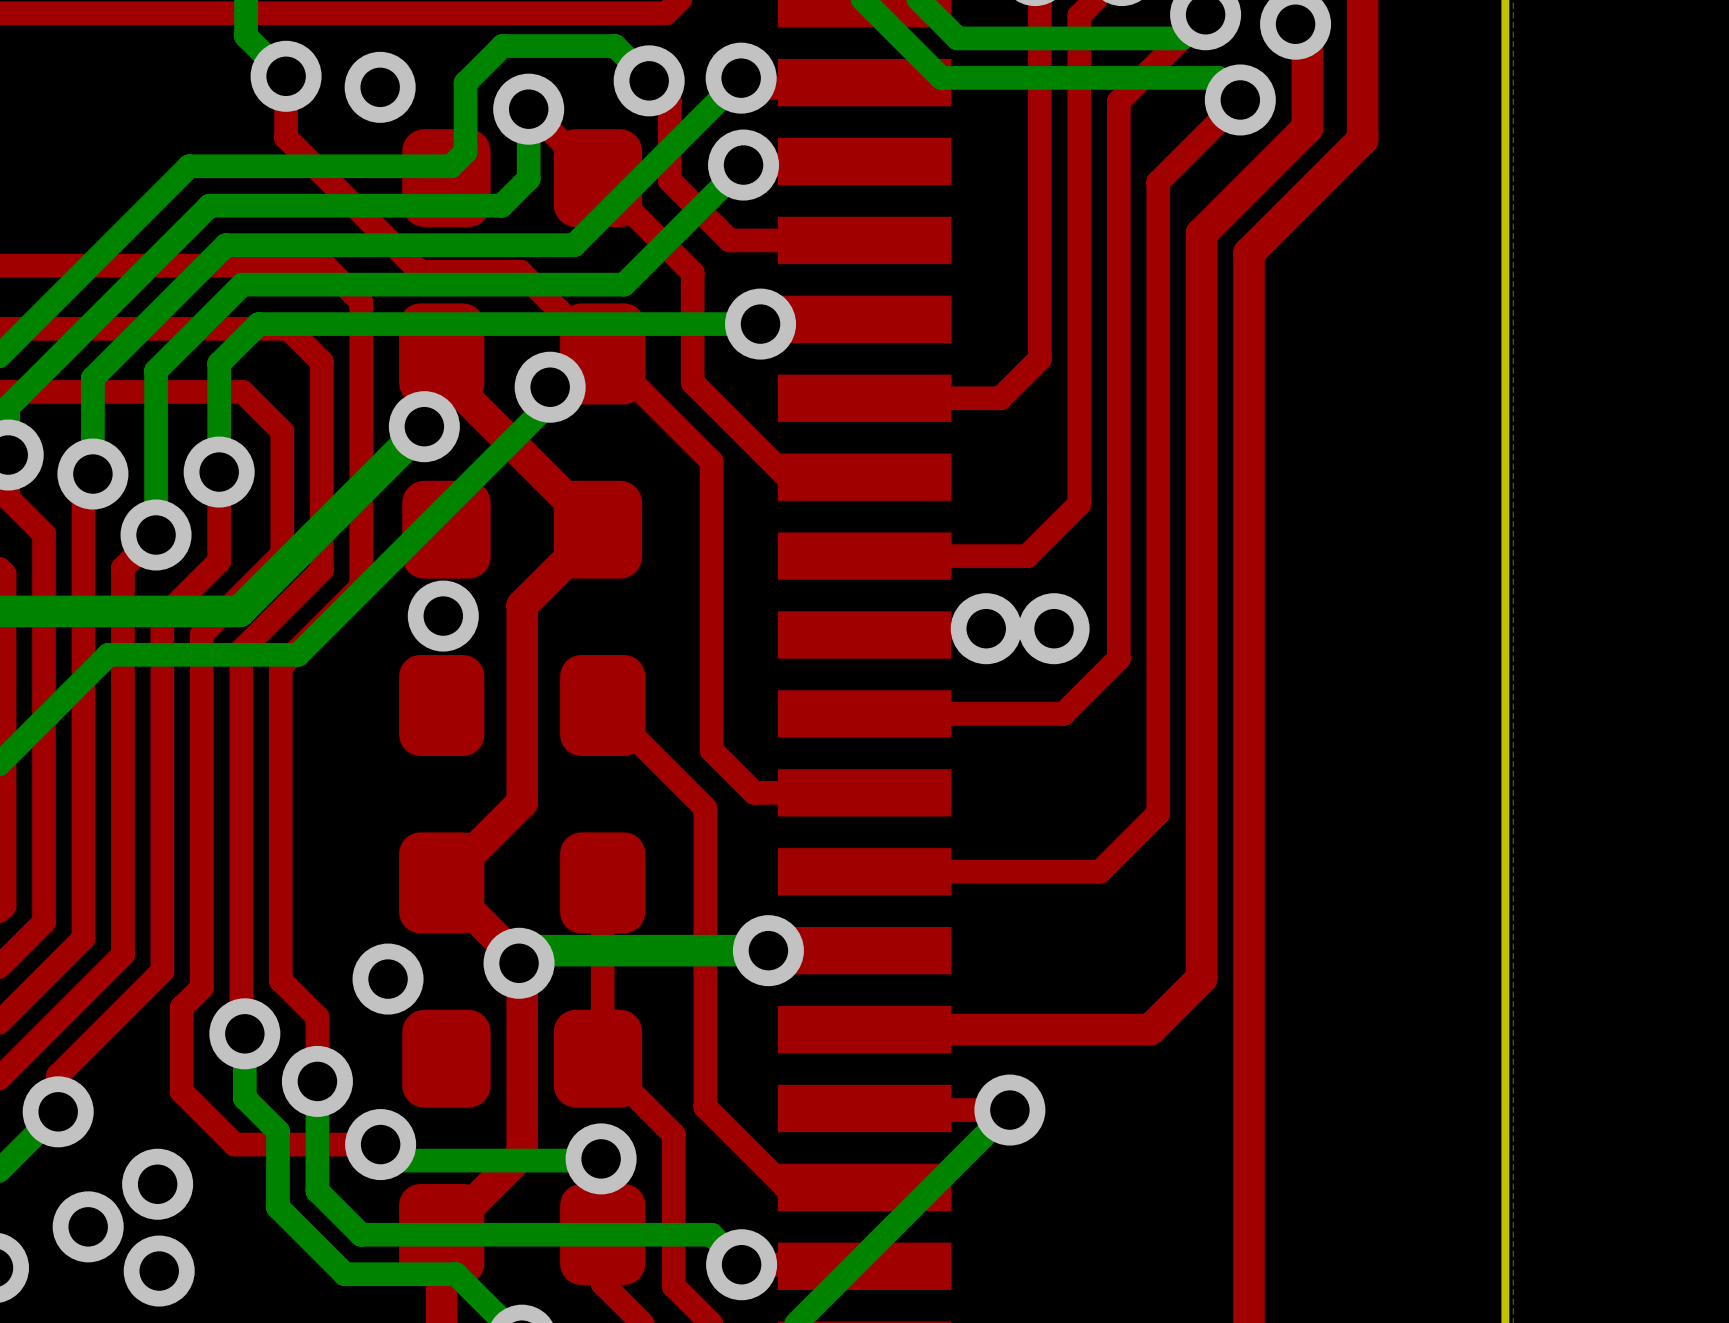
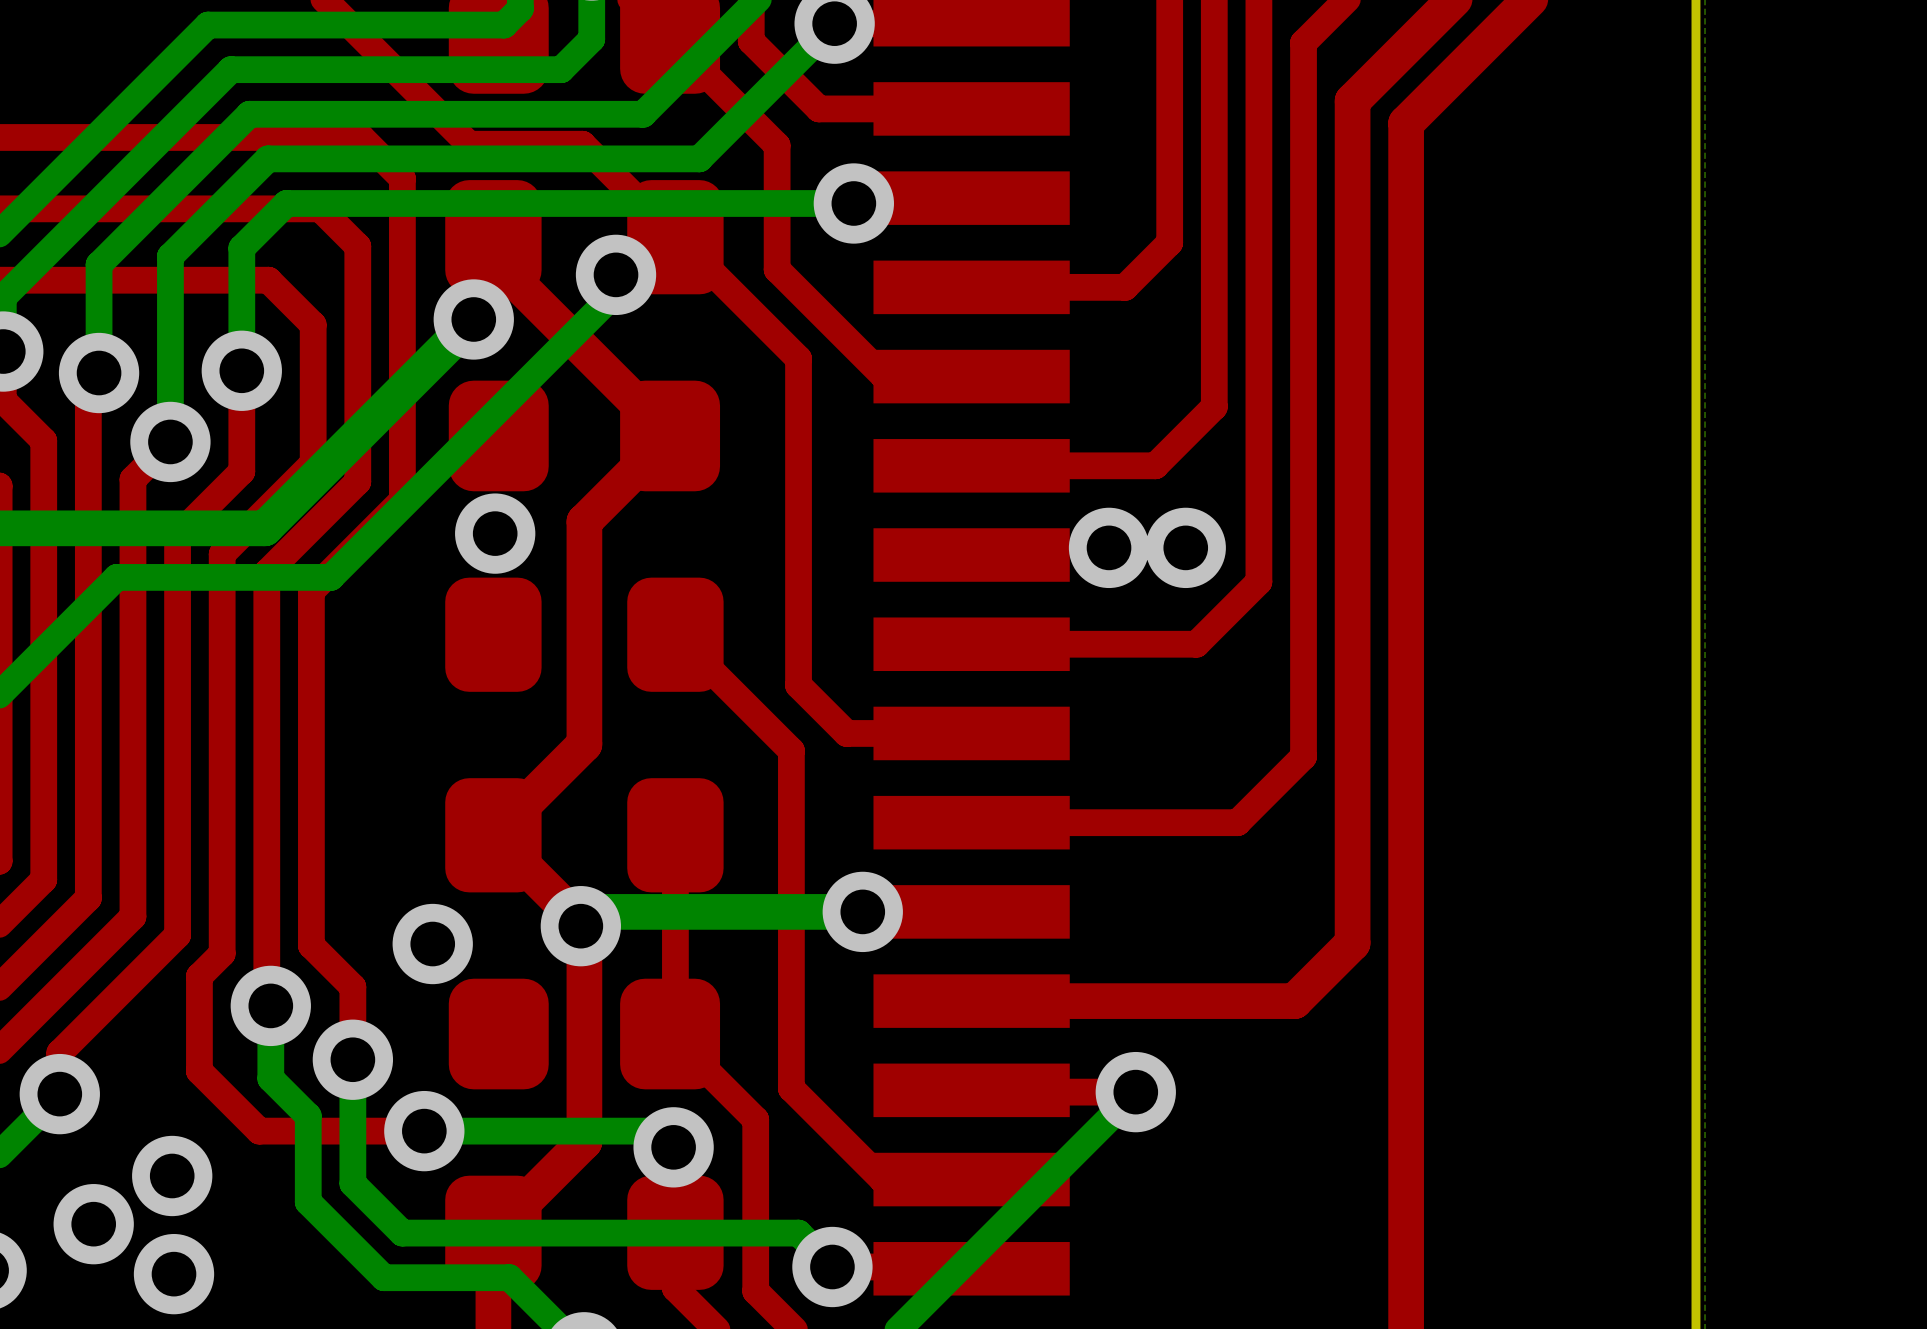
bottom track: (380, 1144) (396, 1160) (599, 1160) -> (424, 1131) (657, 1131) (673, 1147)

